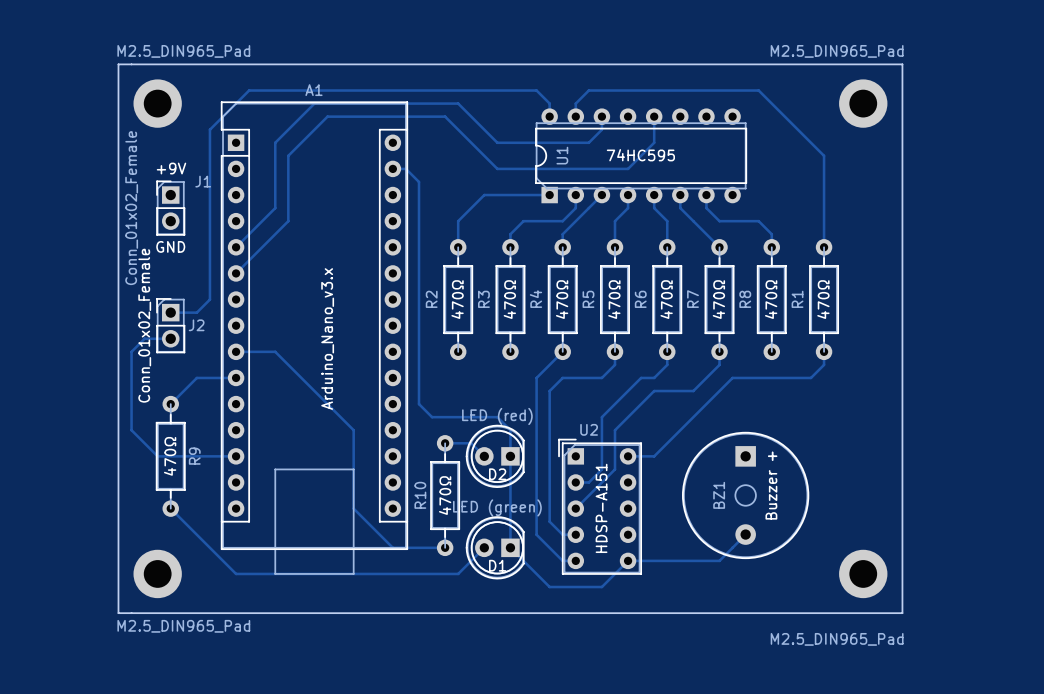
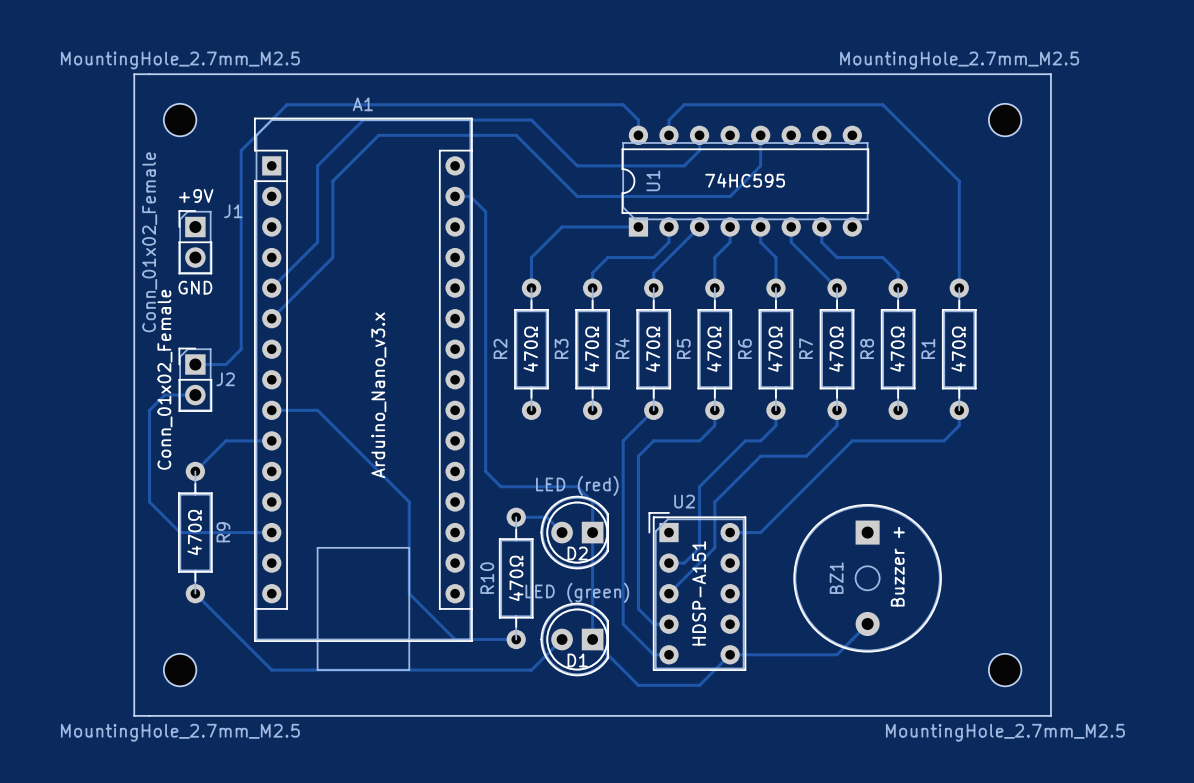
part value: M2.5_DIN965_Pad (183, 51) -> MountingHole_2.7mm_M2.5 (180, 60)
part value: M2.5_DIN965_Pad (837, 51) -> MountingHole_2.7mm_M2.5 (959, 60)
part footprint: [133, 79, 182, 128] -> [163, 103, 197, 137]
part footprint: [839, 79, 888, 128] -> [988, 103, 1022, 137]
part footprint: [133, 549, 182, 599] -> [163, 653, 197, 687]
part footprint: [839, 549, 888, 599] -> [988, 653, 1022, 687]
part value: M2.5_DIN965_Pad (183, 626) -> MountingHole_2.7mm_M2.5 (180, 732)
part value: M2.5_DIN965_Pad (837, 639) -> MountingHole_2.7mm_M2.5 (1005, 732)

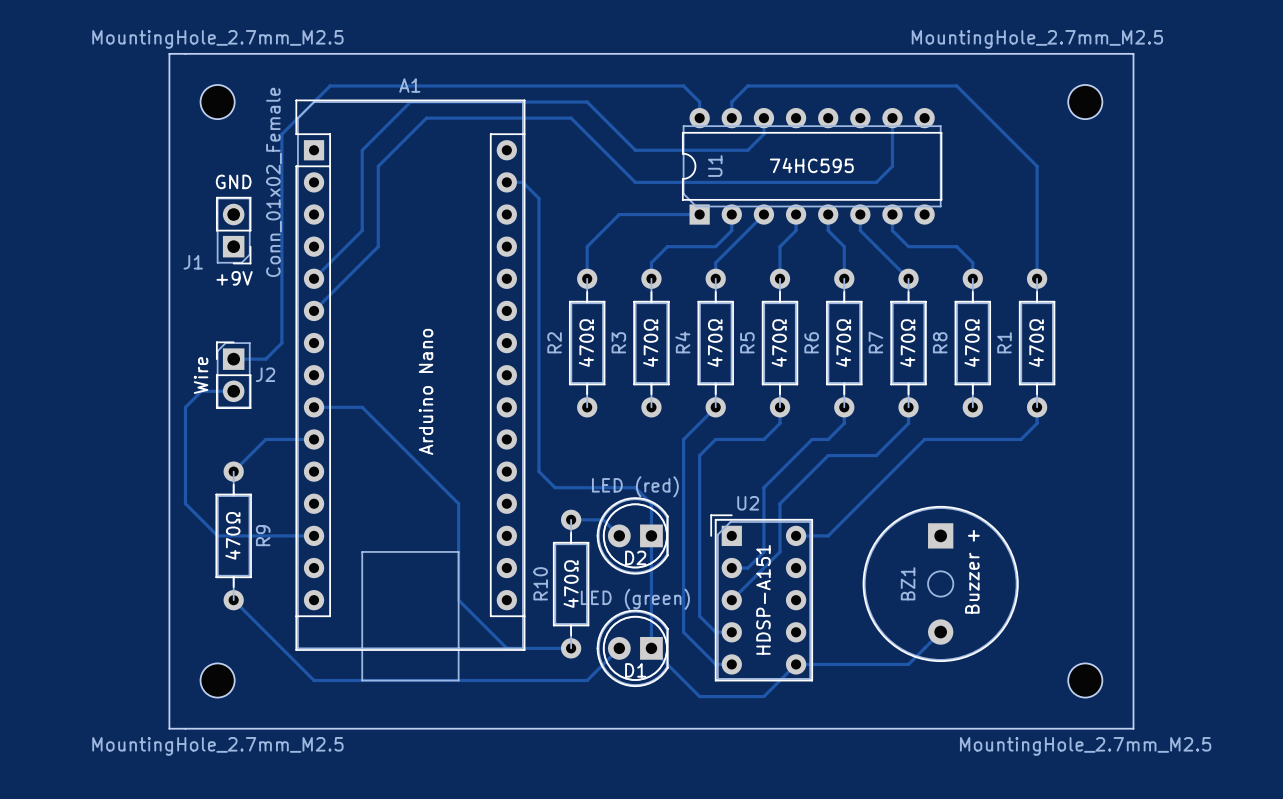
track: (760, 135) (760, 165) (730, 196) -> (892, 118) (892, 166) (876, 182) (796, 182)
J1 value position: Conn_01x02_Female (149, 242) -> Conn_01x02_Female (273, 182)
J1 rotation: 0° (195, 242) -> 180° (233, 230)
J2 value: Conn_01x02_Female (164, 379) -> Wire (201, 375)
A1 value: Arduino_Nano_v3.x (378, 395) -> Arduino Nano (426, 391)

